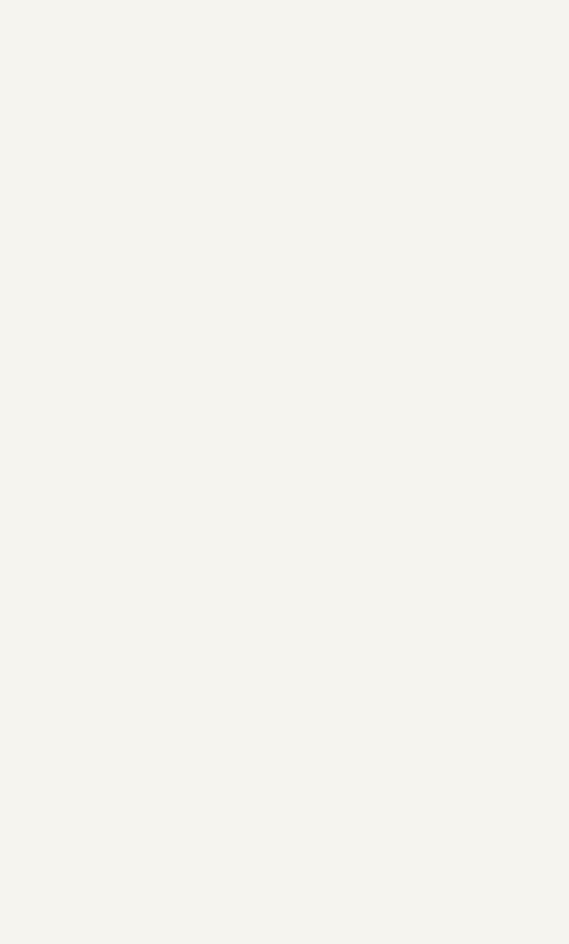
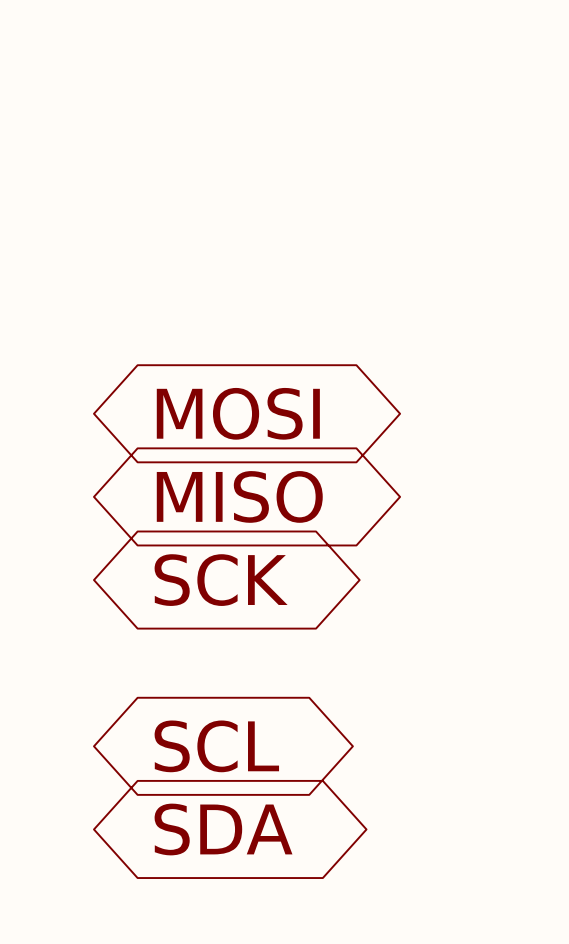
global label: none -> MOSI (238, 413)
global label: none -> MISO (239, 496)
global label: none -> SCK (221, 580)
global label: none -> SCL (216, 746)
global label: none -> SDA (223, 829)

